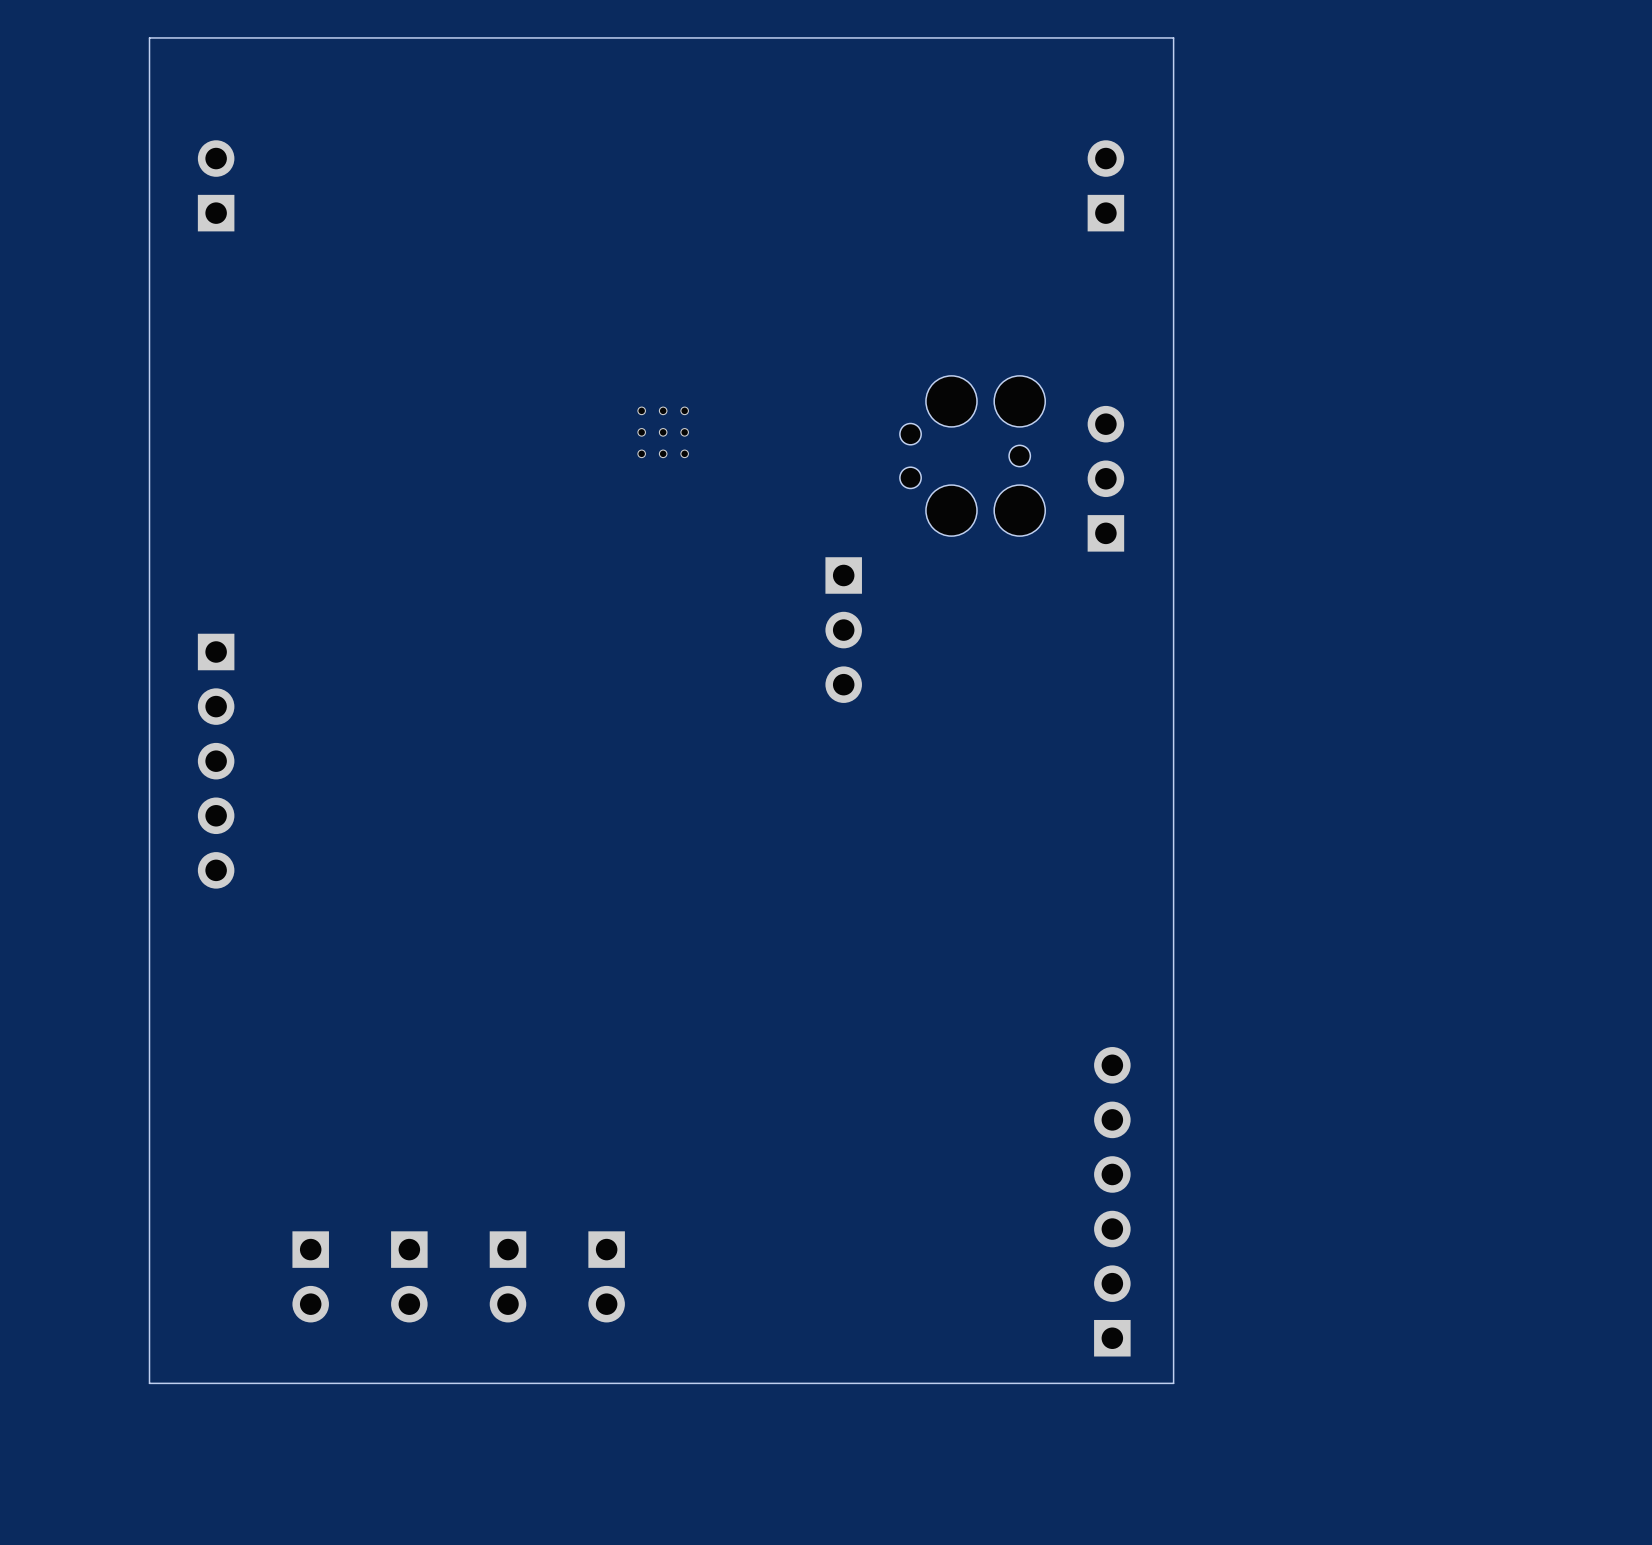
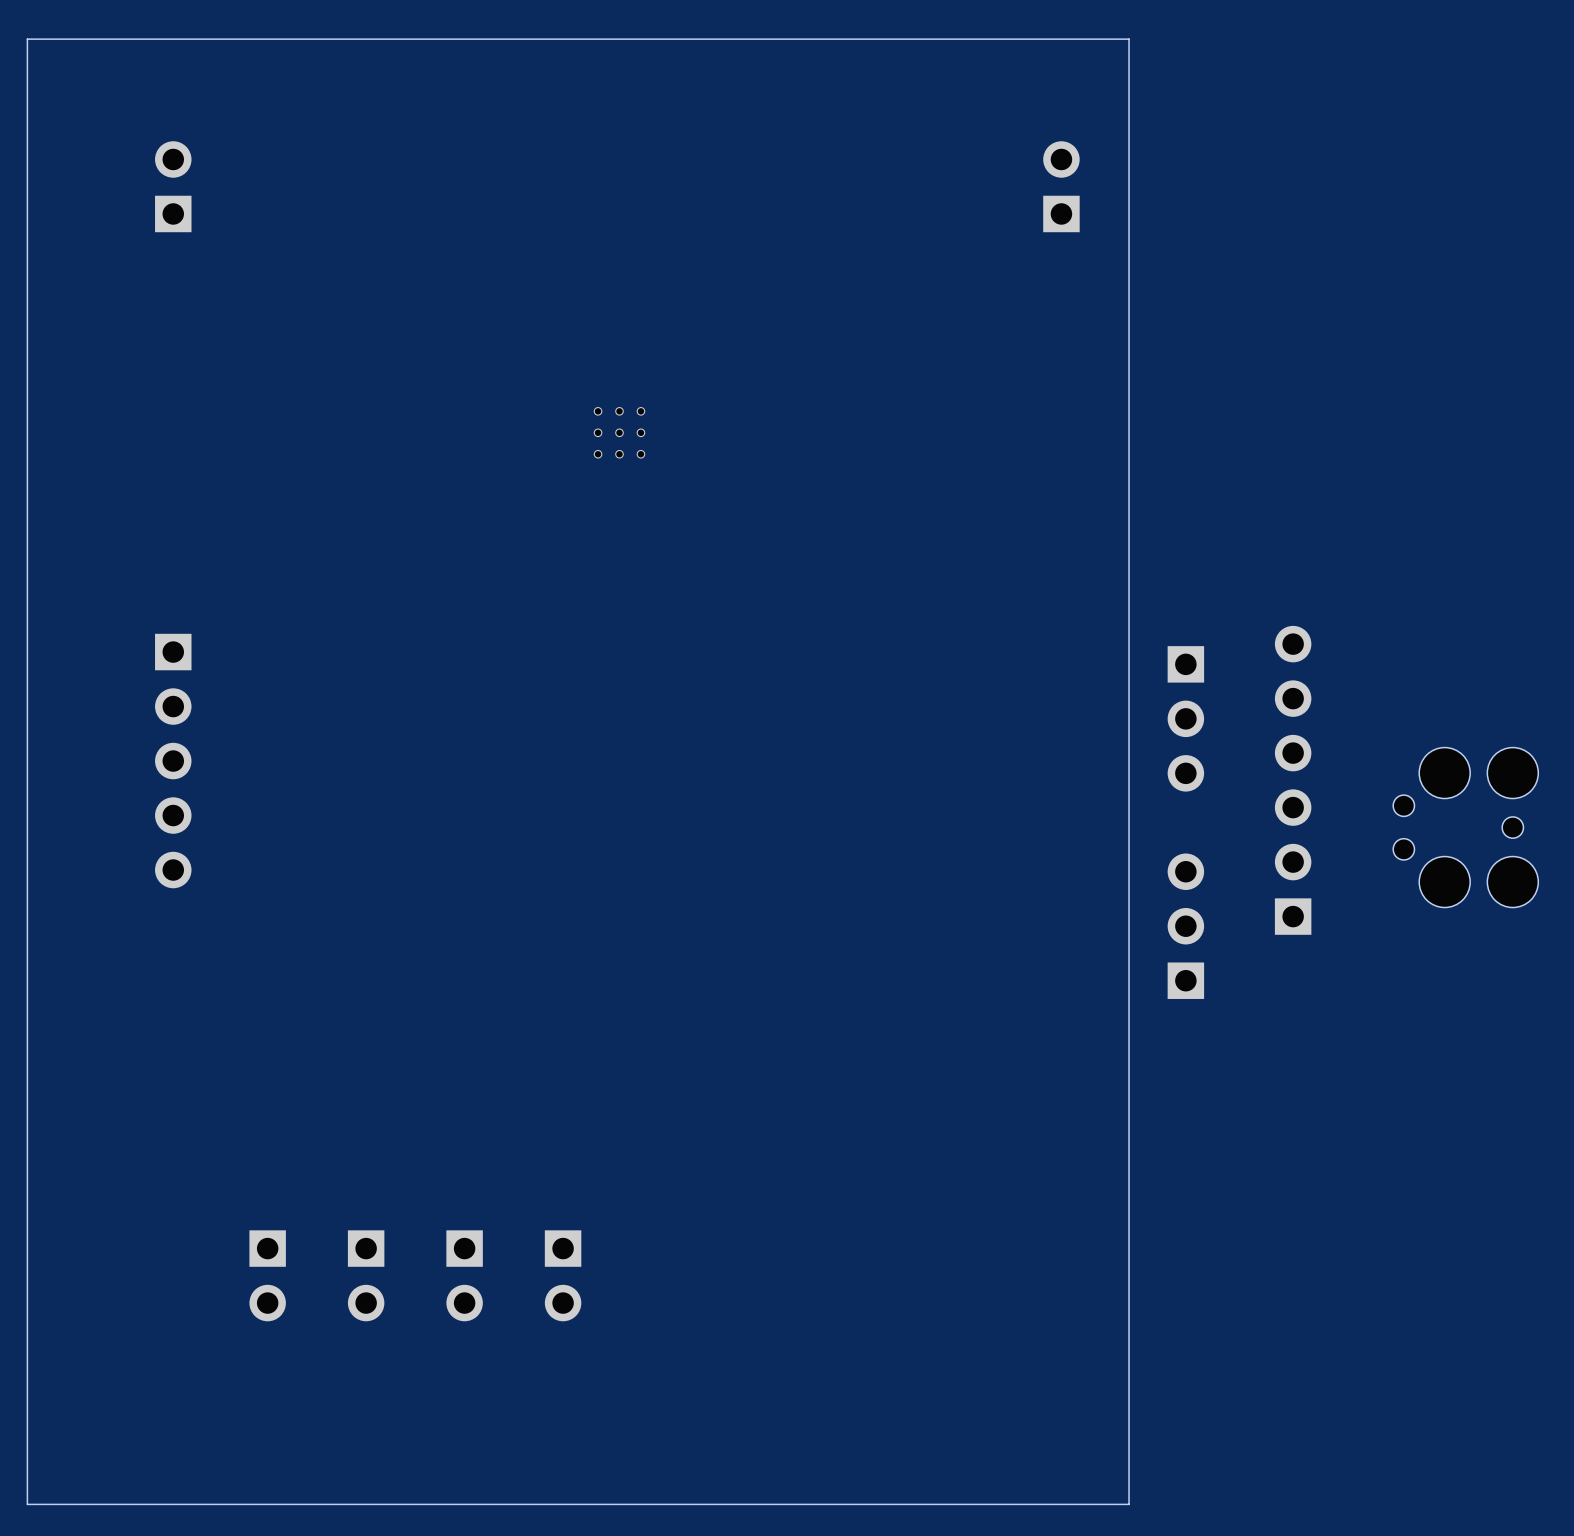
board edge: (149, 37) (149, 1383) (1173, 1383) -> (106, 39) (27, 39) (27, 1504) (1129, 1504) (1129, 1382)
part: (972, 455) -> none
part: (1105, 478) -> none
part: (843, 630) -> none
part: none -> (1185, 718)
part: none -> (1465, 827)
part: none -> (1185, 926)
part position: (1112, 1201) -> (1293, 780)

